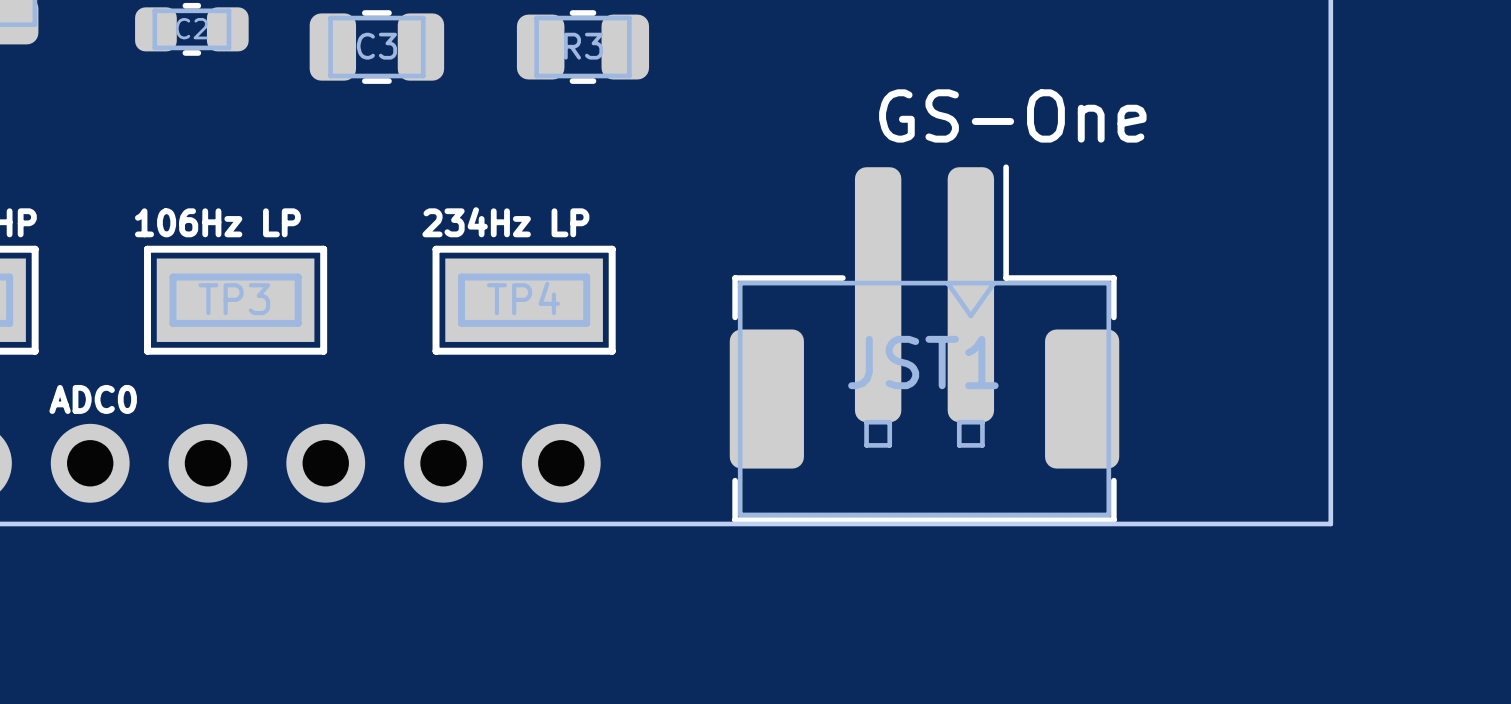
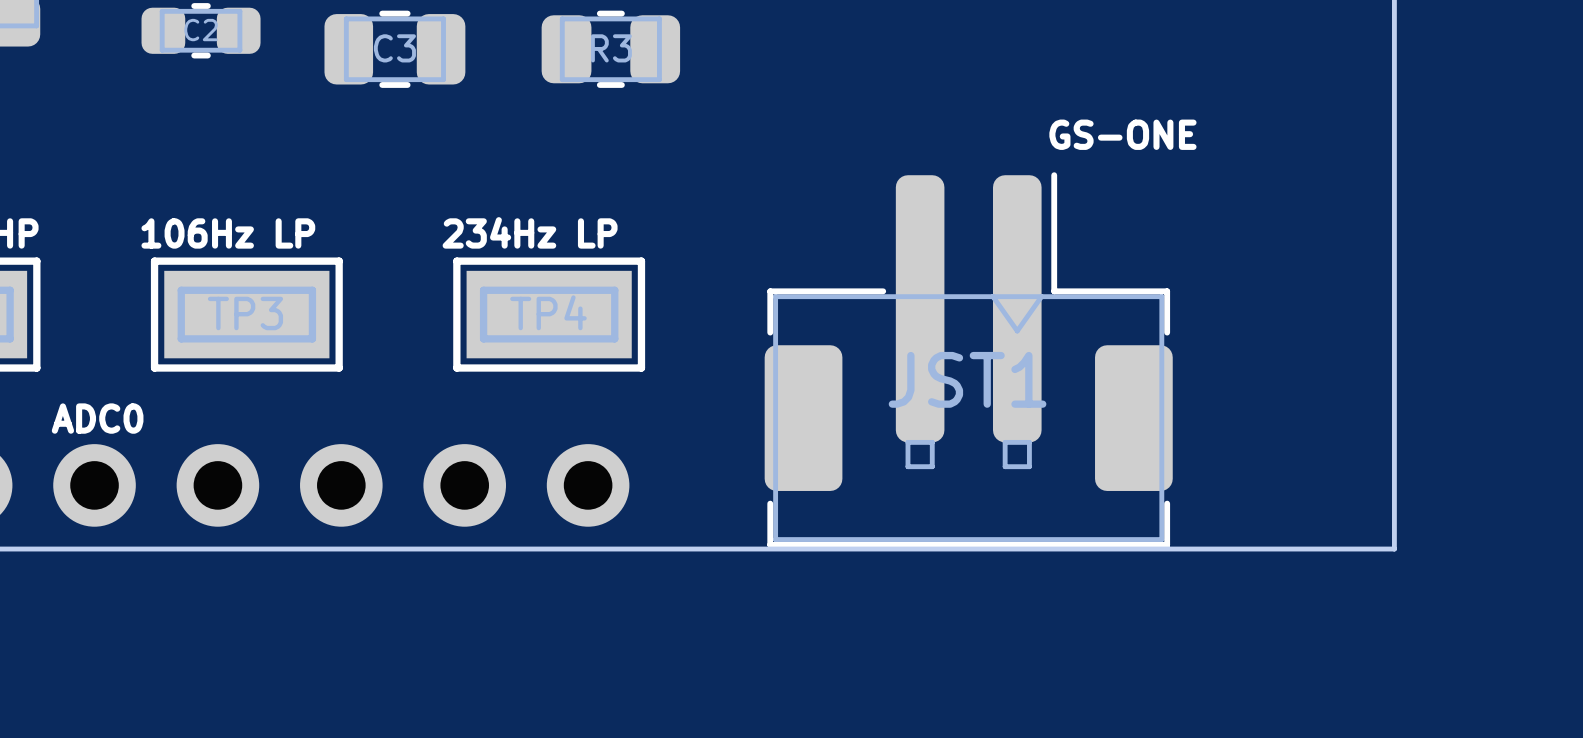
text: GS-One (1012, 115) -> GS-ONE (1122, 134)

